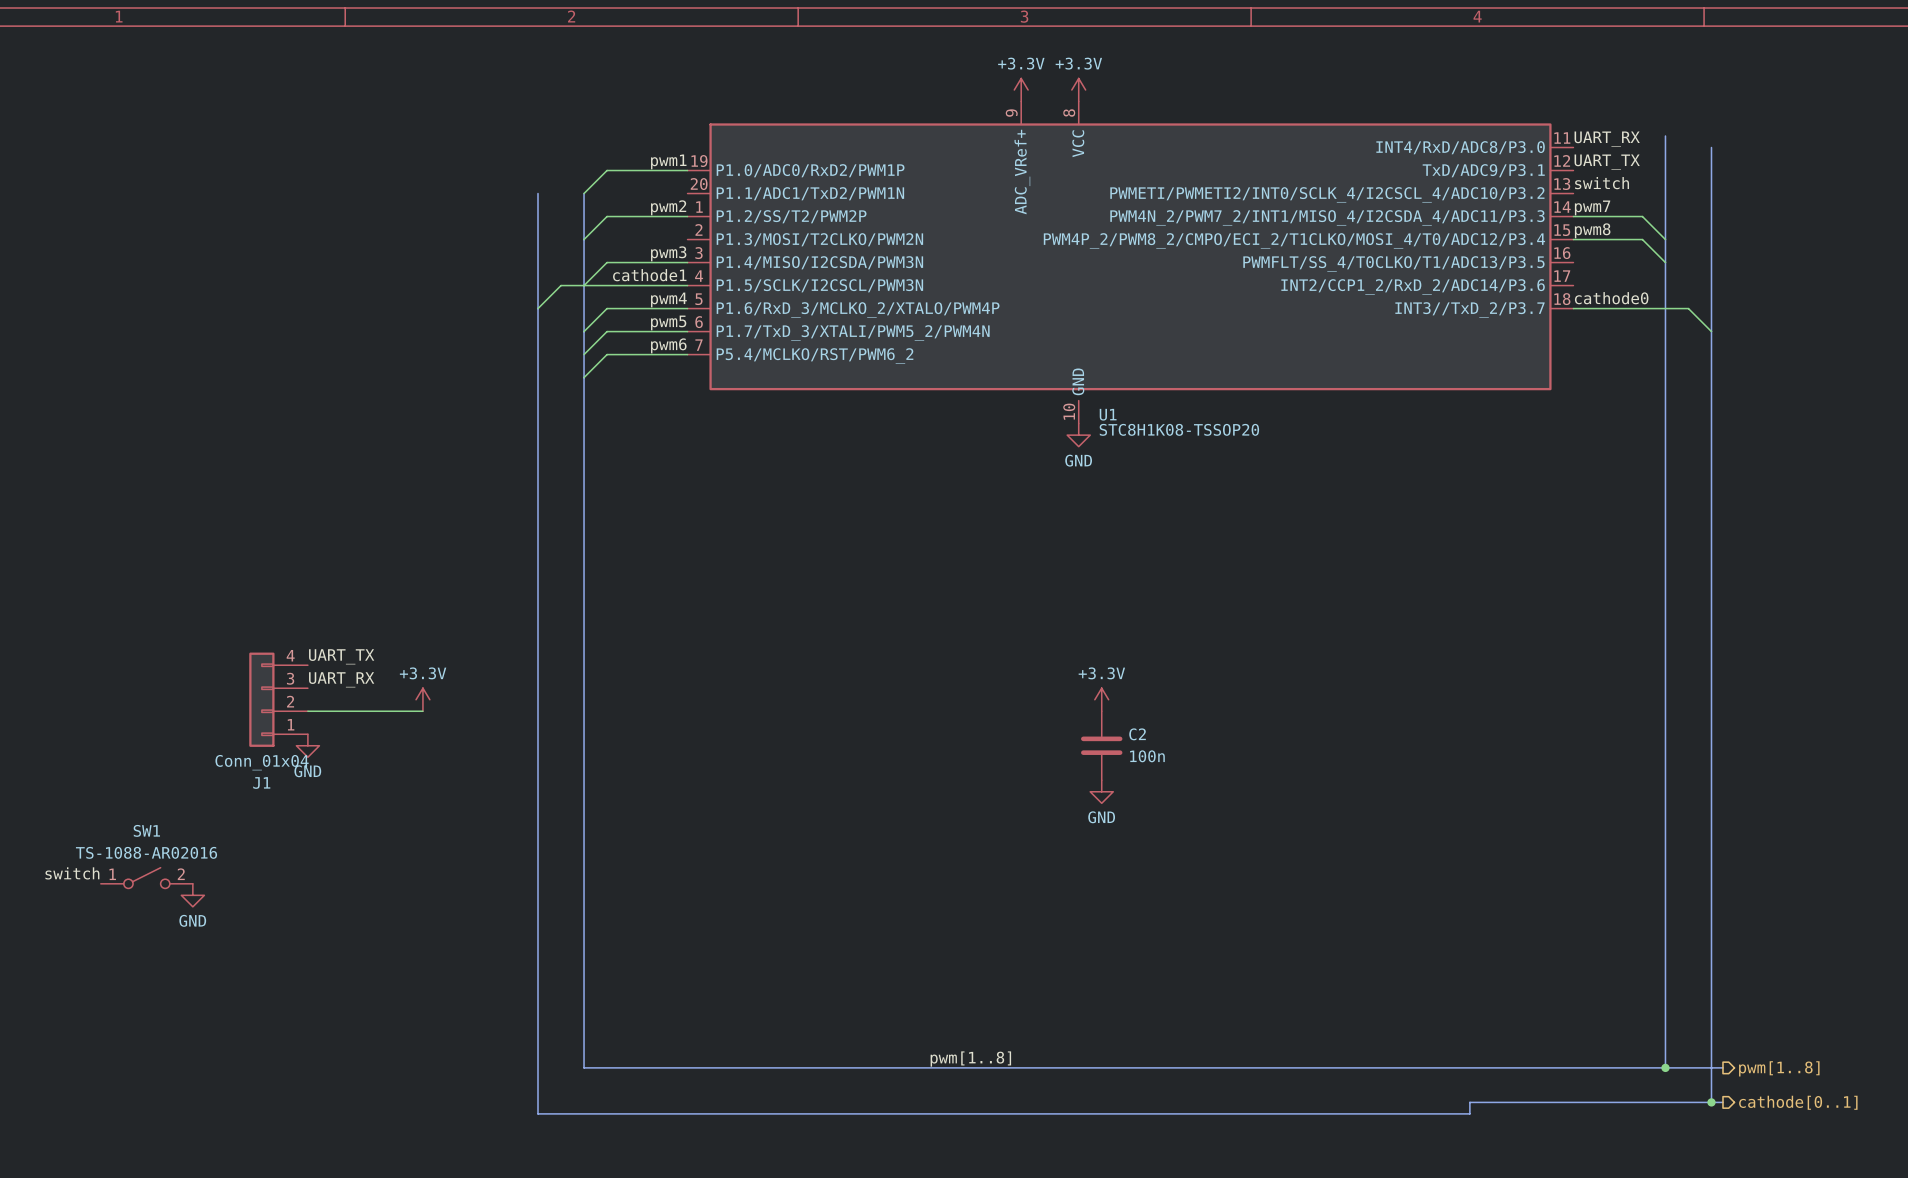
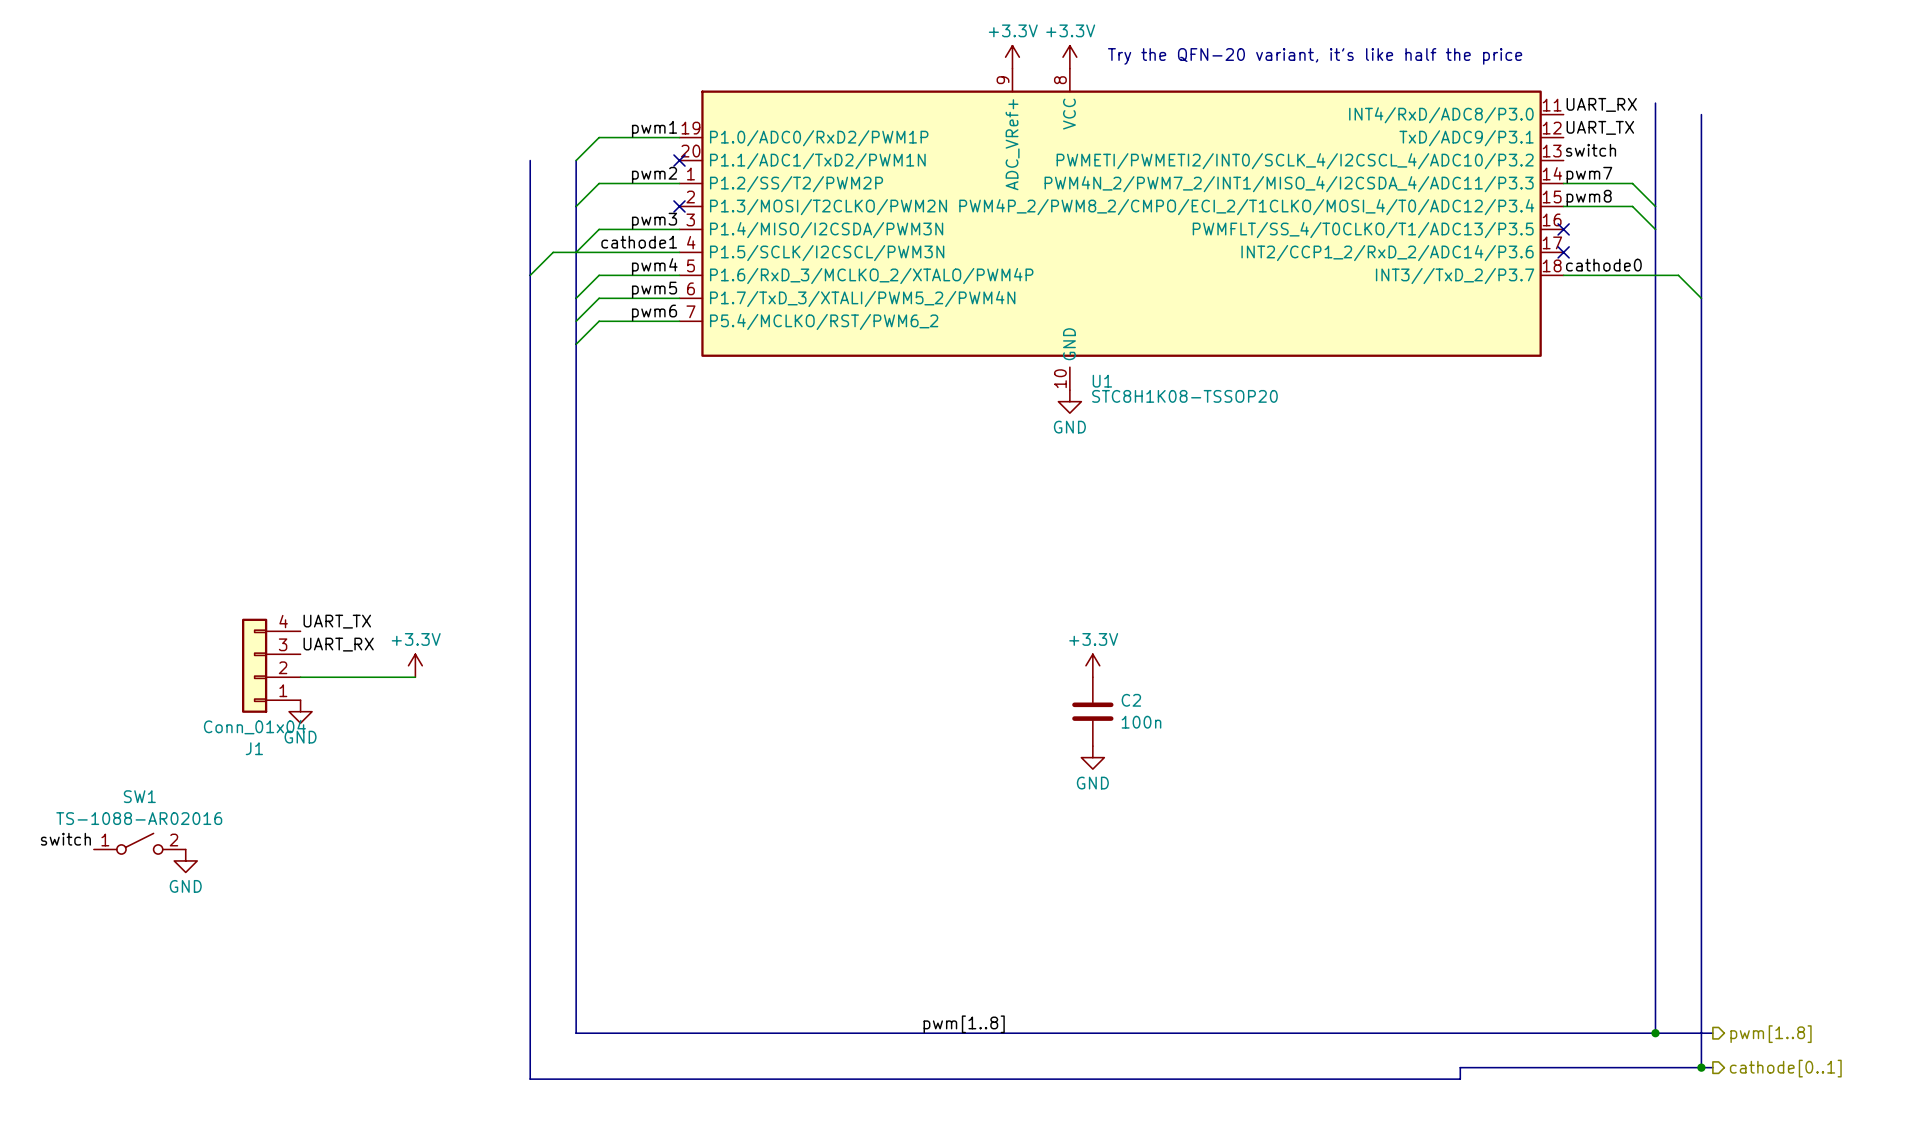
text: none -> Try the QFN-20 variant, it's like half the price (1315, 56)
no-connect mark: none -> (679, 160)
no-connect mark: none -> (679, 206)
no-connect mark: none -> (1563, 229)
no-connect mark: none -> (1563, 252)

